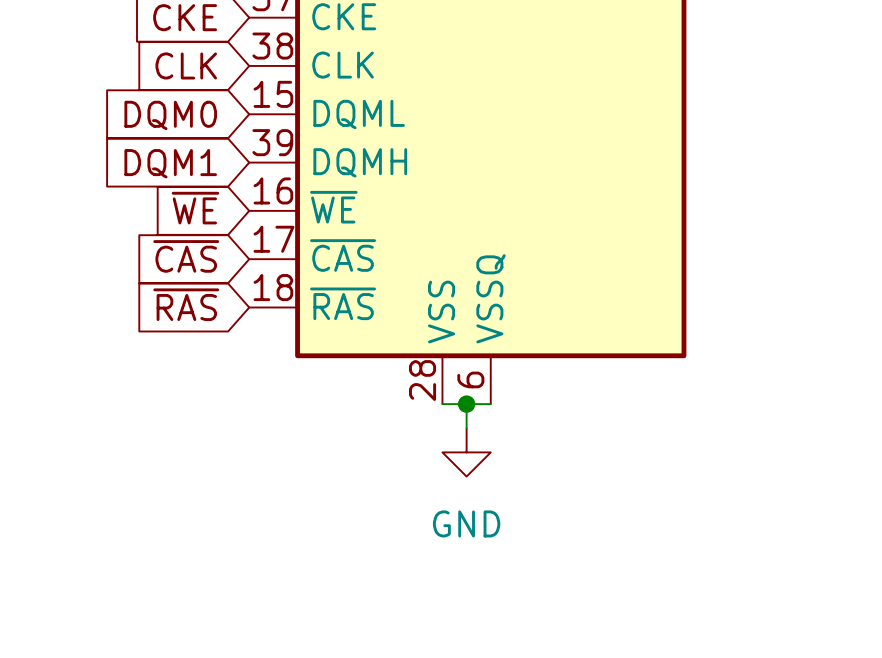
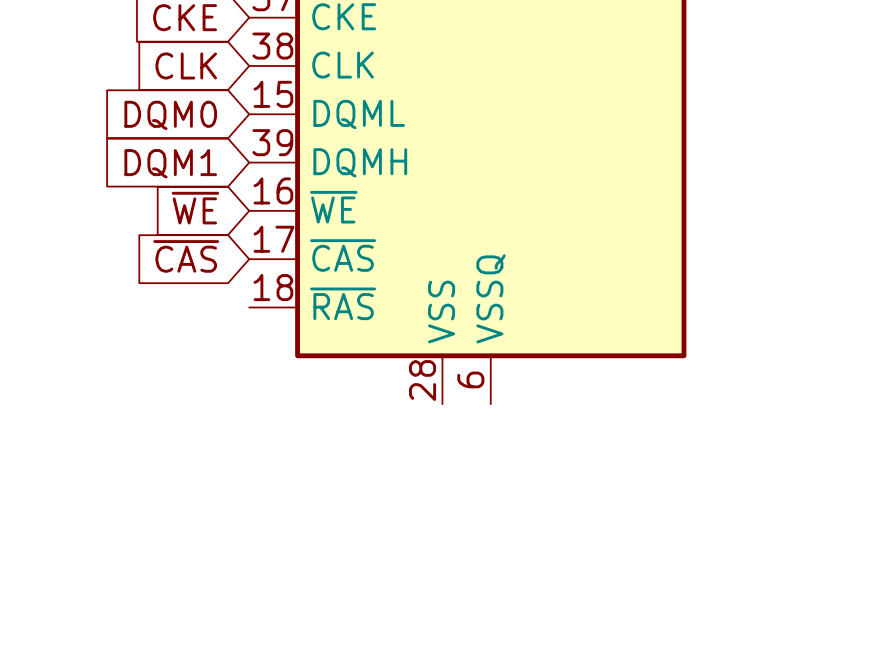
global label: ~{RAS} (186, 304) -> none
wire: (442, 404) (490, 404) -> none
wire: (466, 404) (466, 428) -> none
junction: (466, 404) -> none
power symbol: GND (466, 452) -> none

